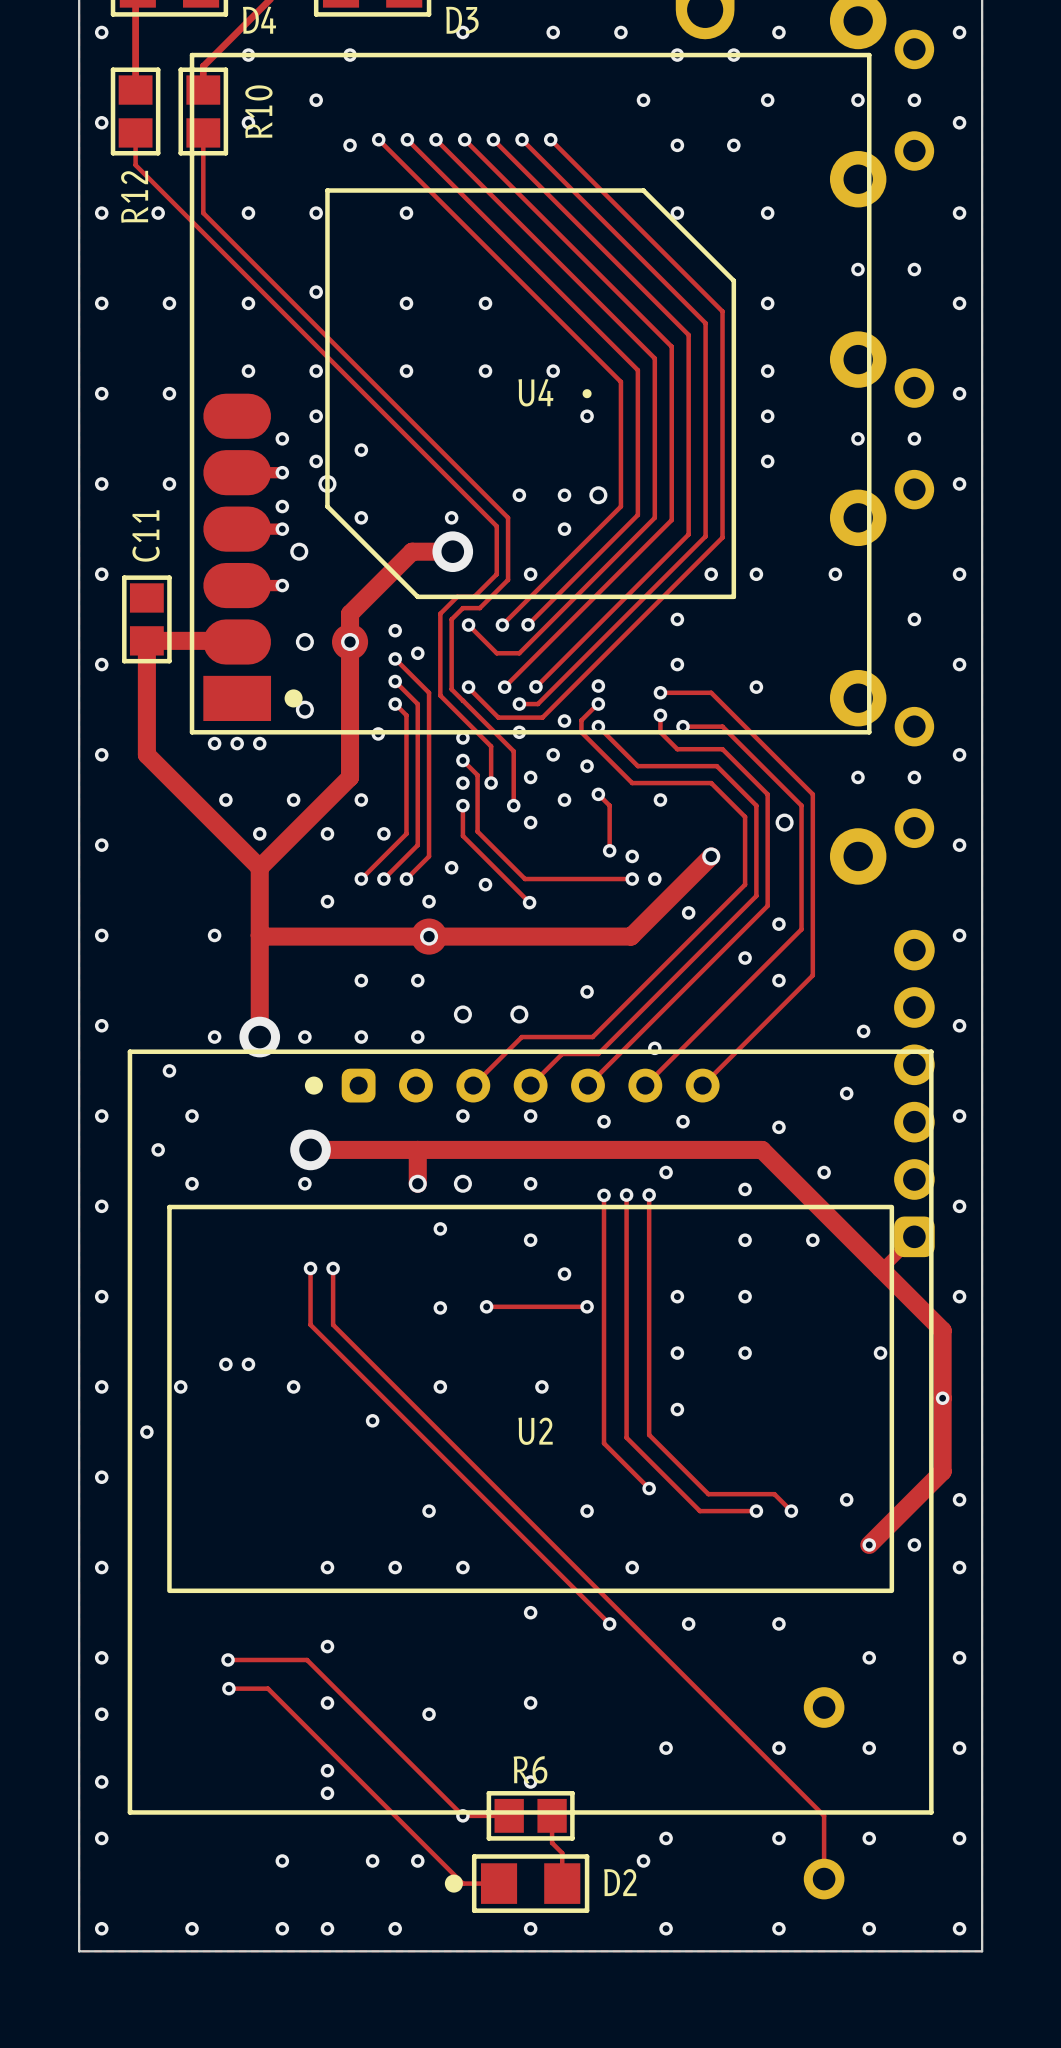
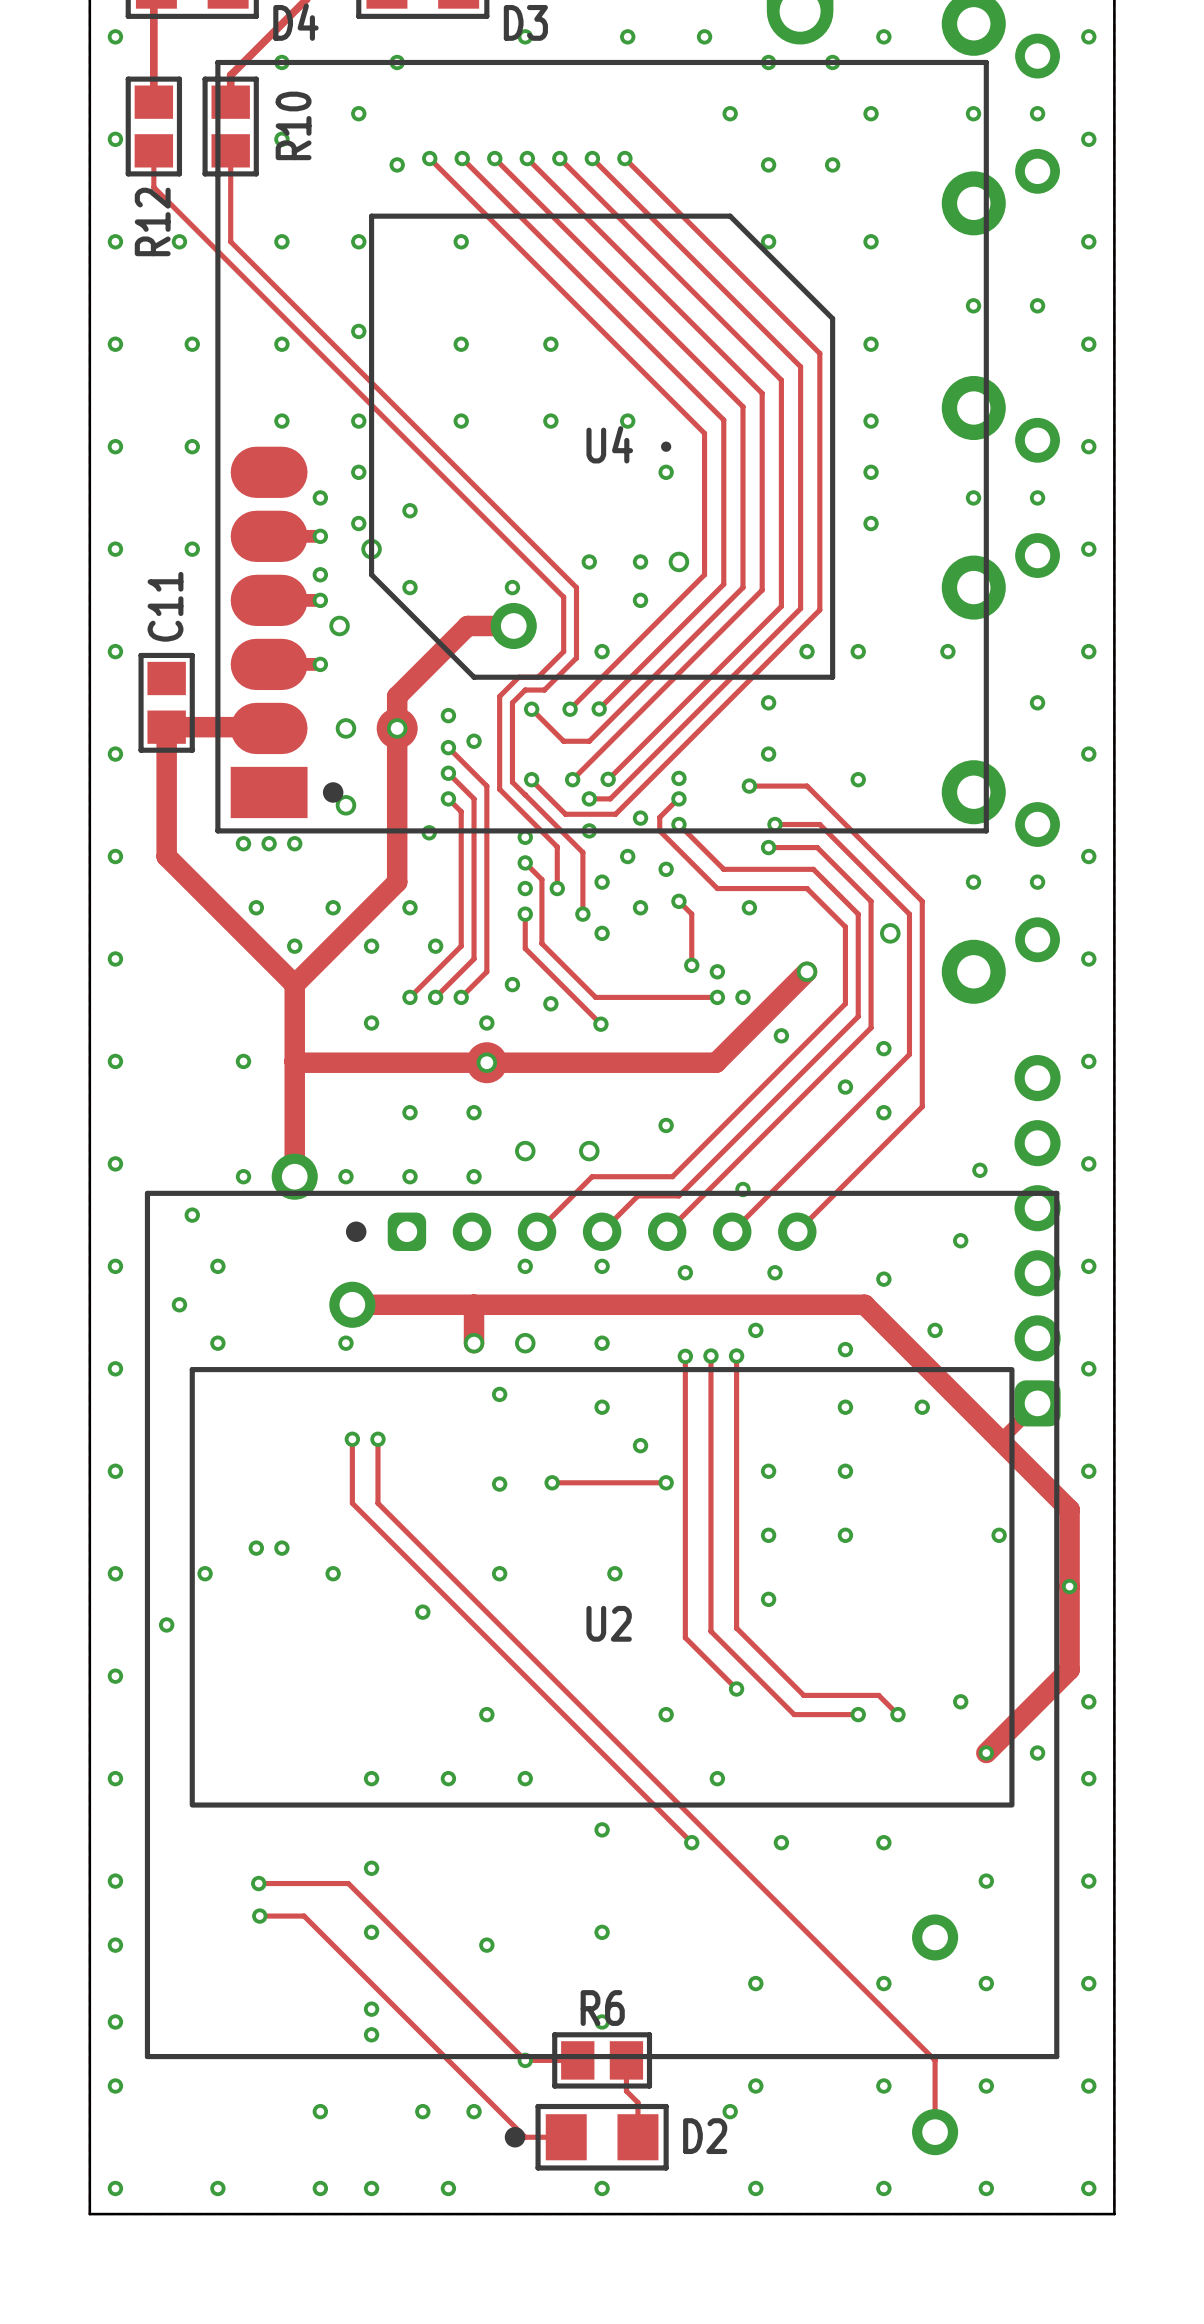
track: (660, 715) (660, 732) (677, 749) (722, 749) -> (768, 847) (817, 847) (819, 850)
via position: (660, 715) -> (768, 847)

